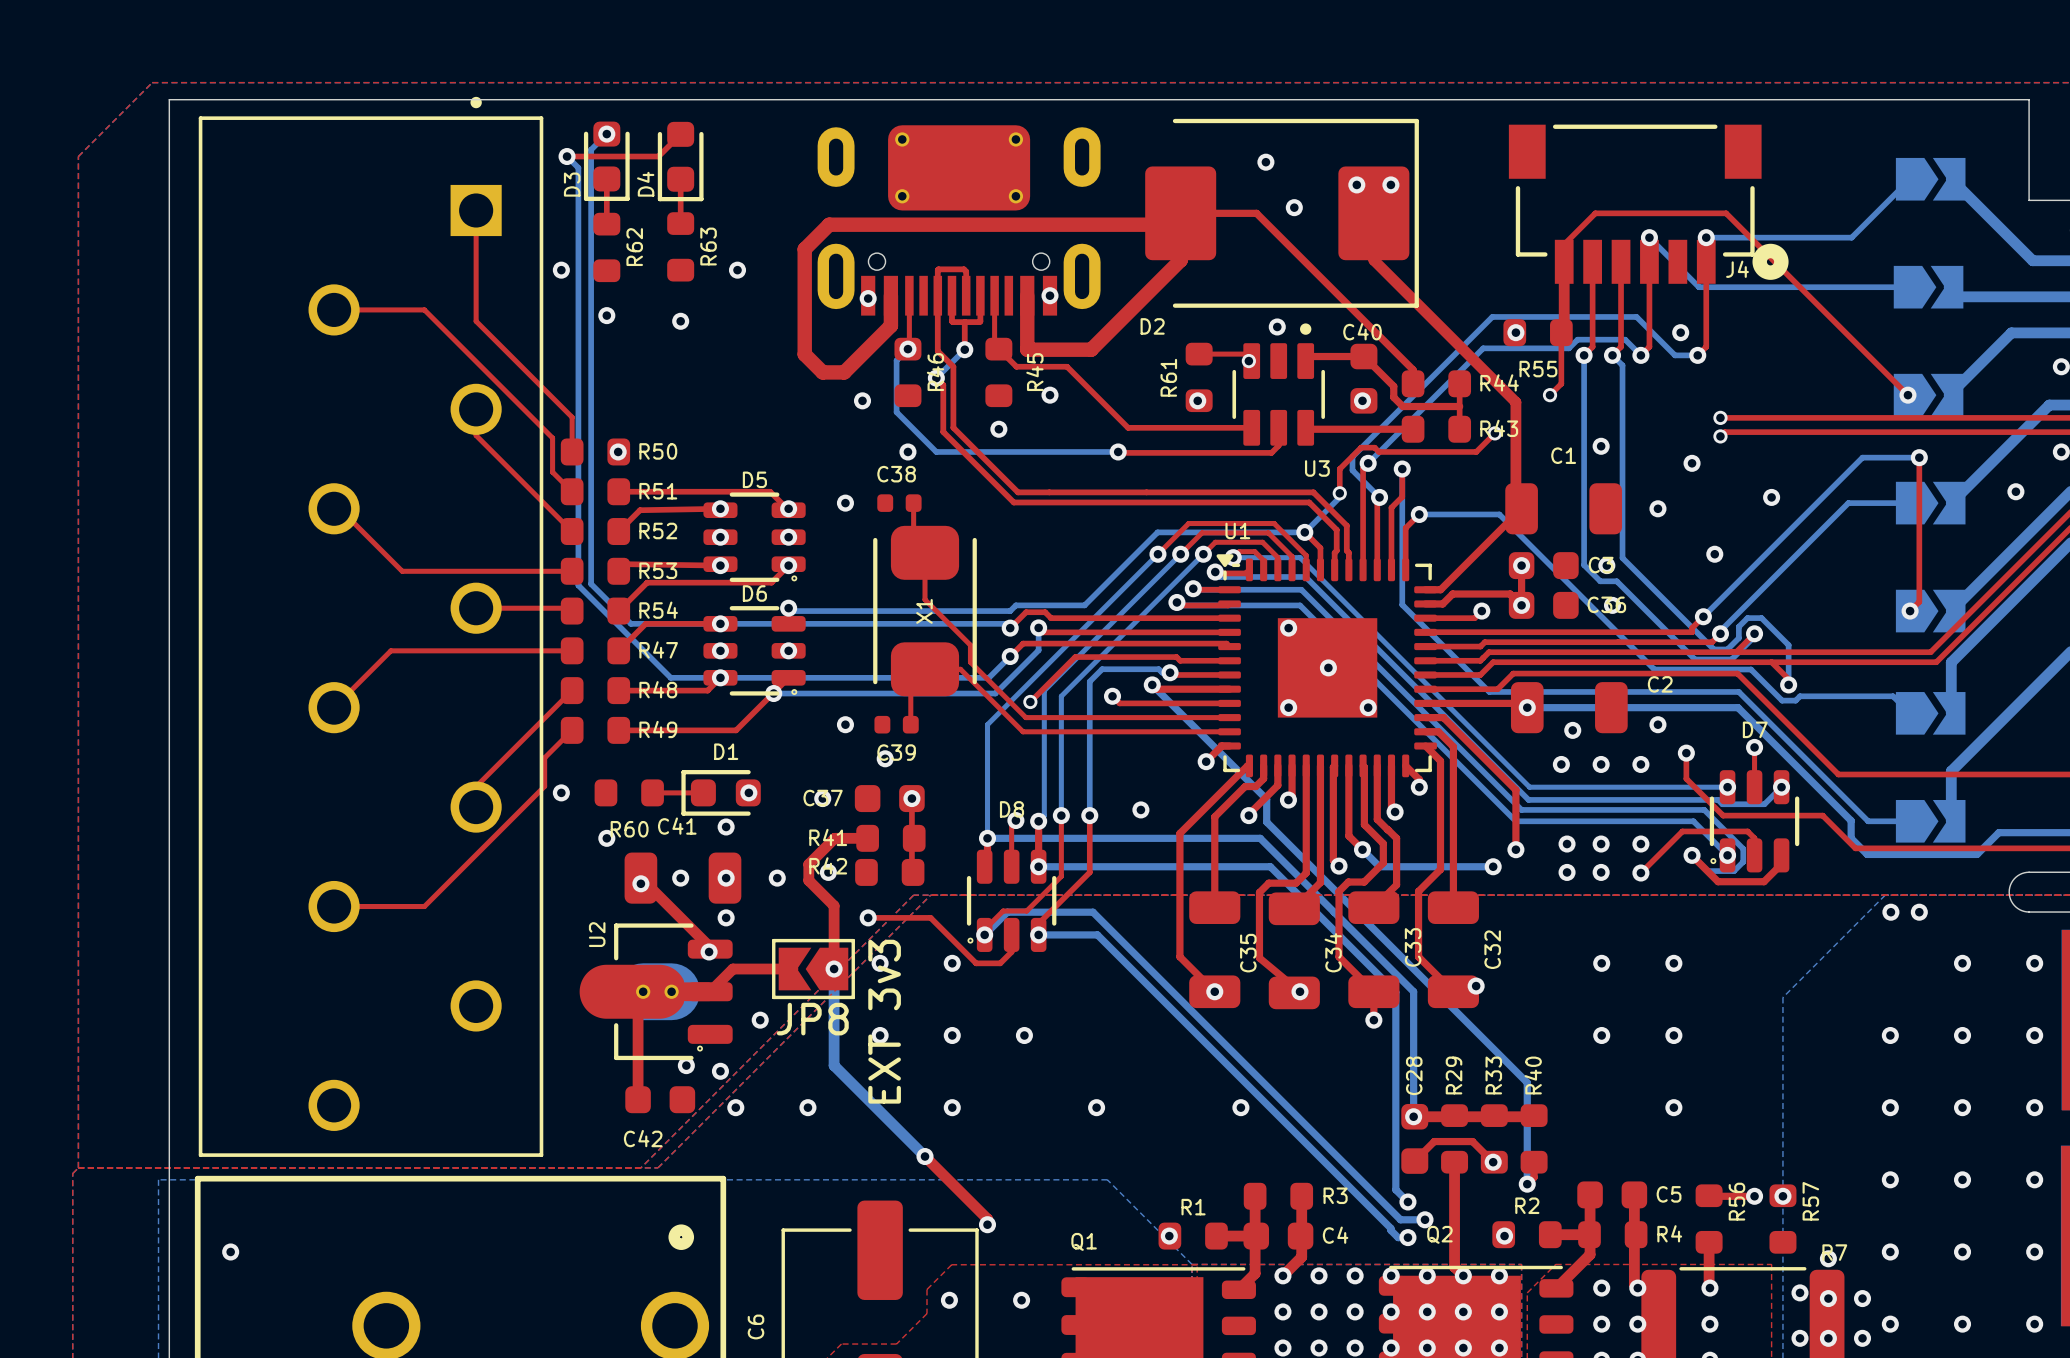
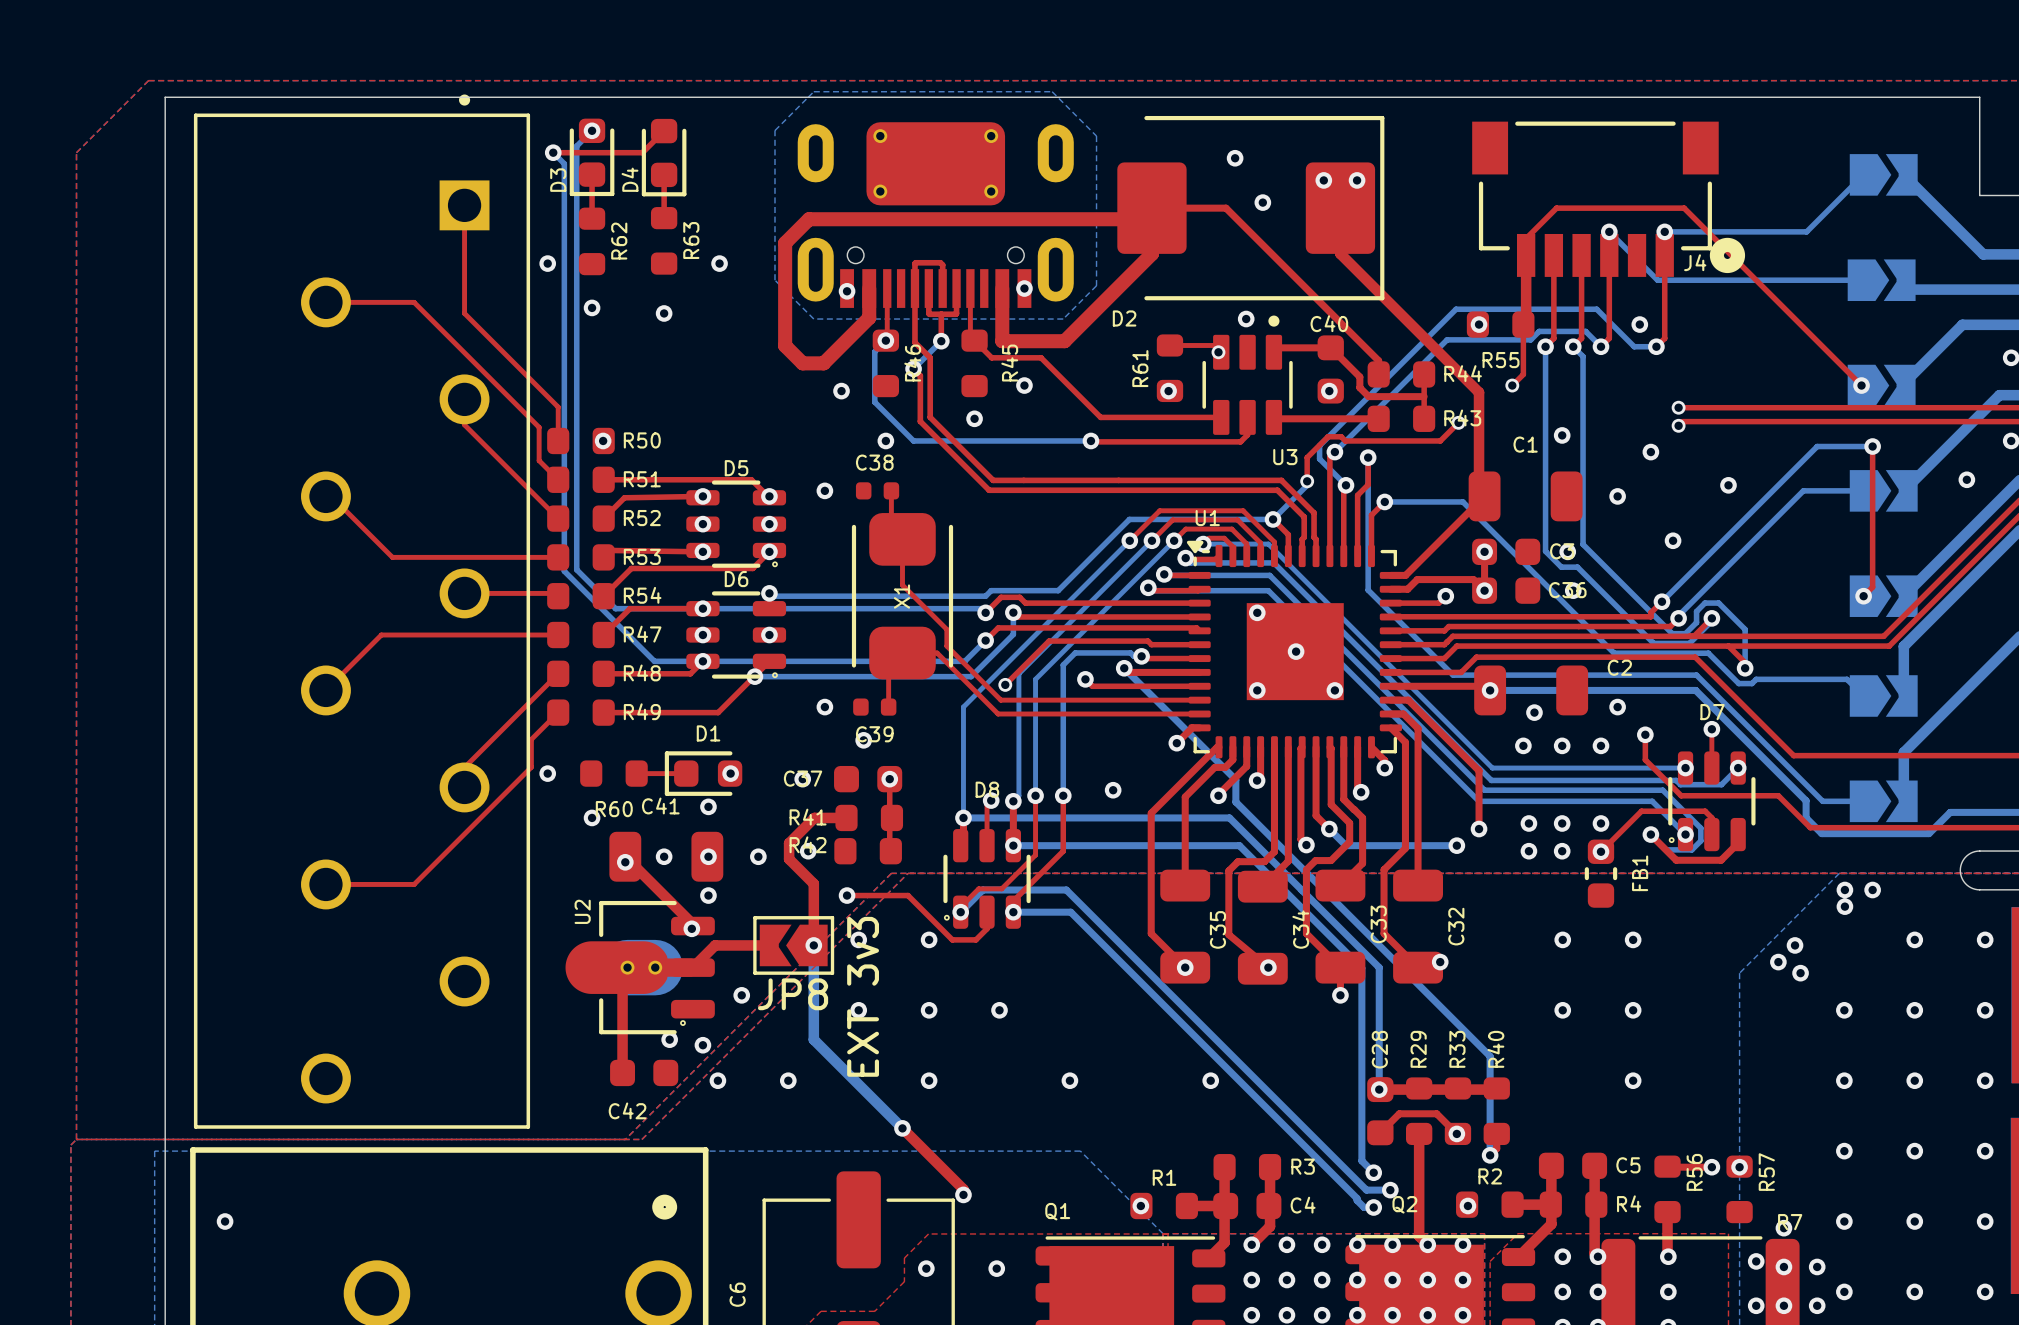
bottom zone outline: none -> (813, 91) (1052, 91) (1096, 136) (1096, 285) (1063, 319) (813, 319) (774, 280) (774, 130) (813, 91)
FB1: none -> (1600, 873)
via: none -> (1844, 906)
via: none -> (1795, 945)
via: none -> (1778, 962)
via: none -> (1800, 973)

